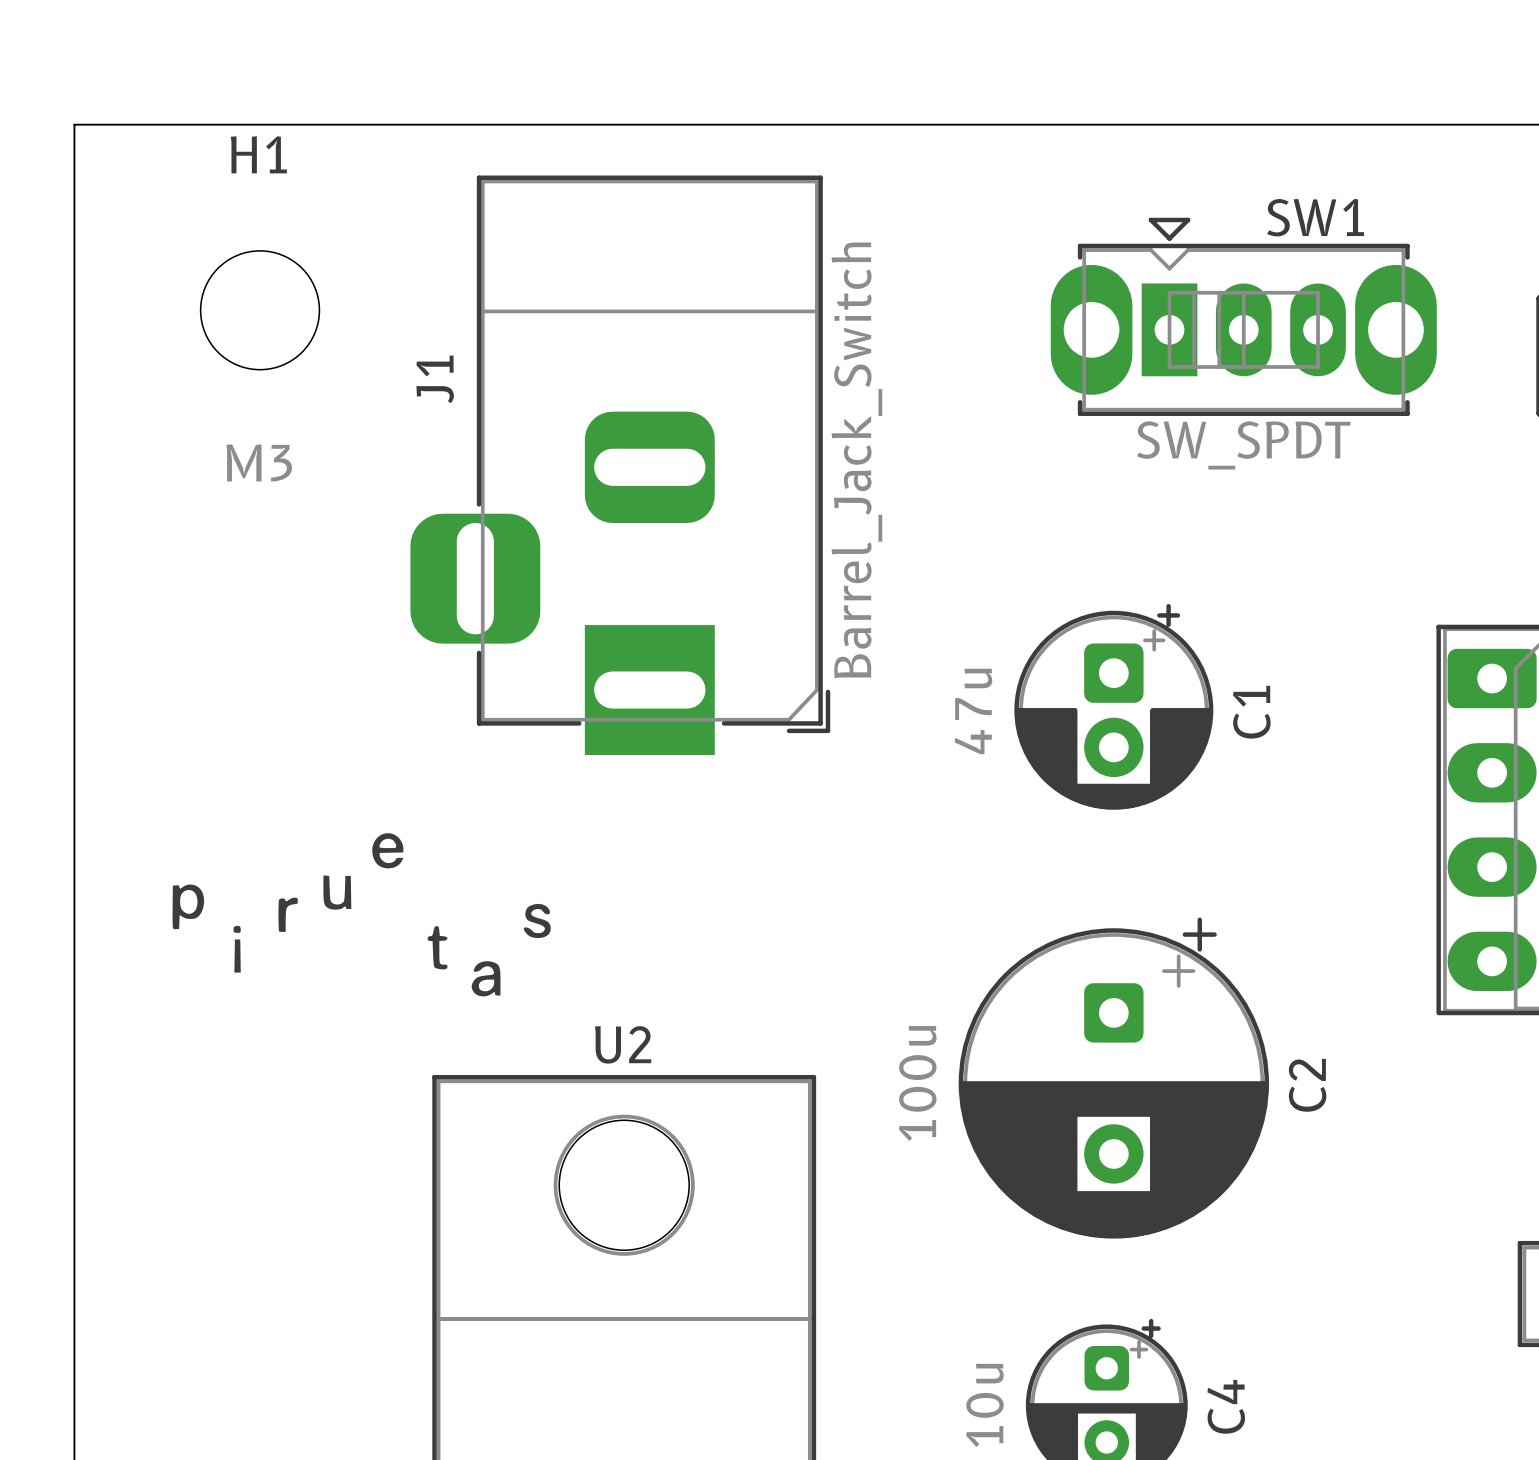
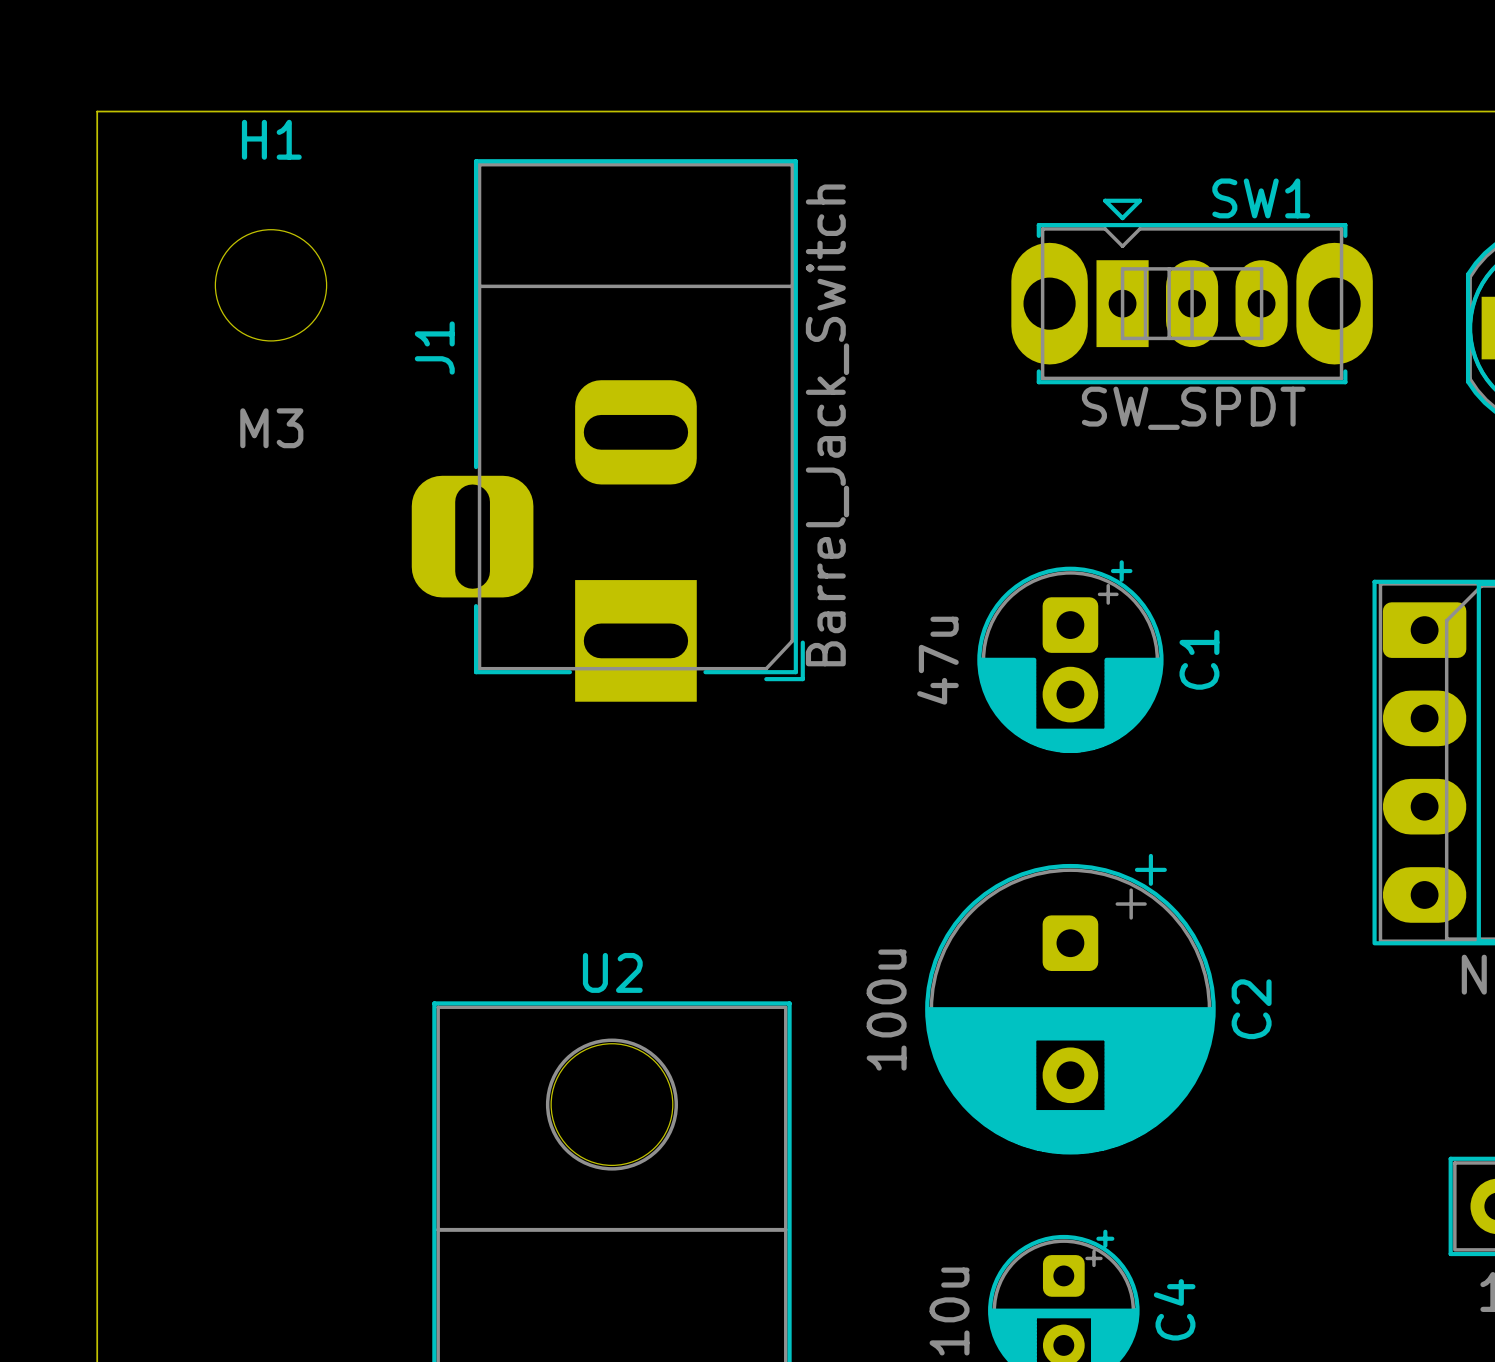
drawing: [172, 833, 404, 973] -> none
drawing: [427, 903, 551, 997] -> none

